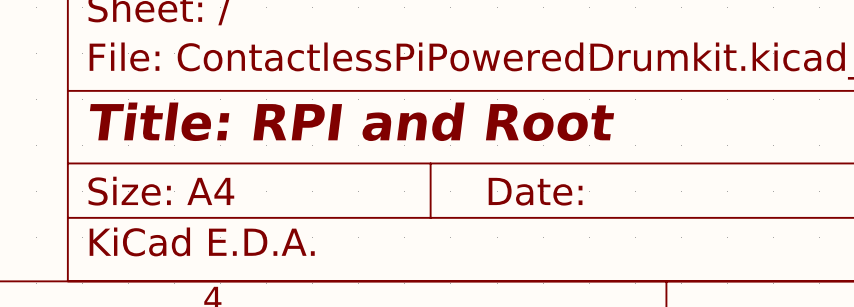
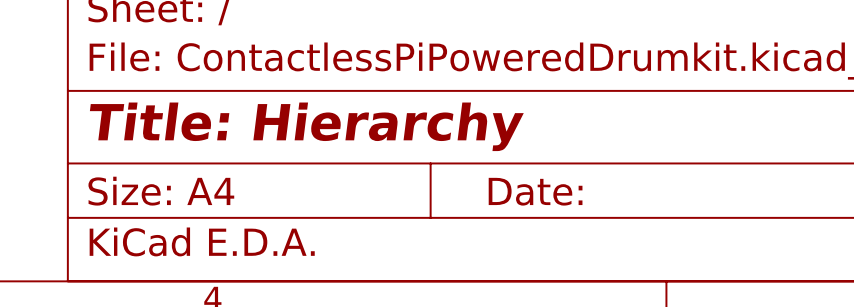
title block: Title: RPI and Root (352, 121) -> Title: Hierarchy (306, 126)

